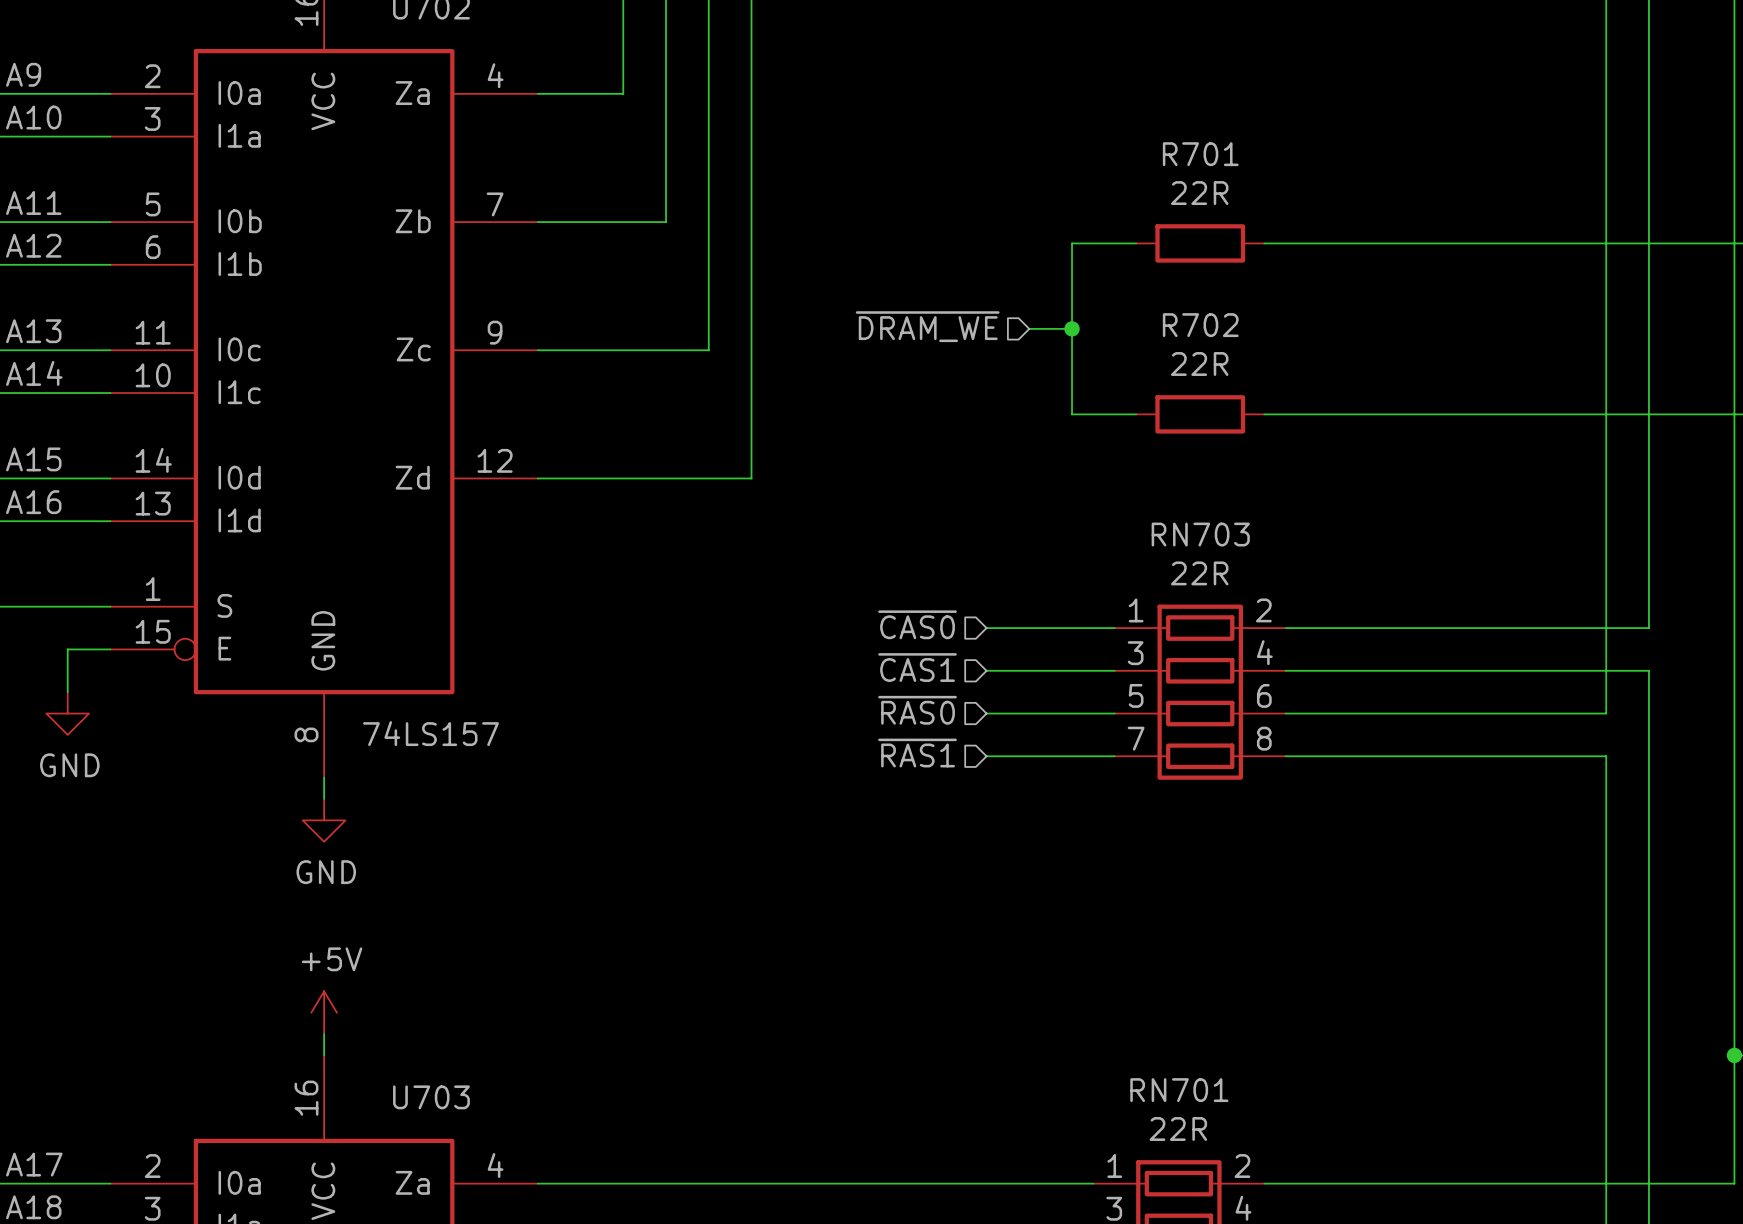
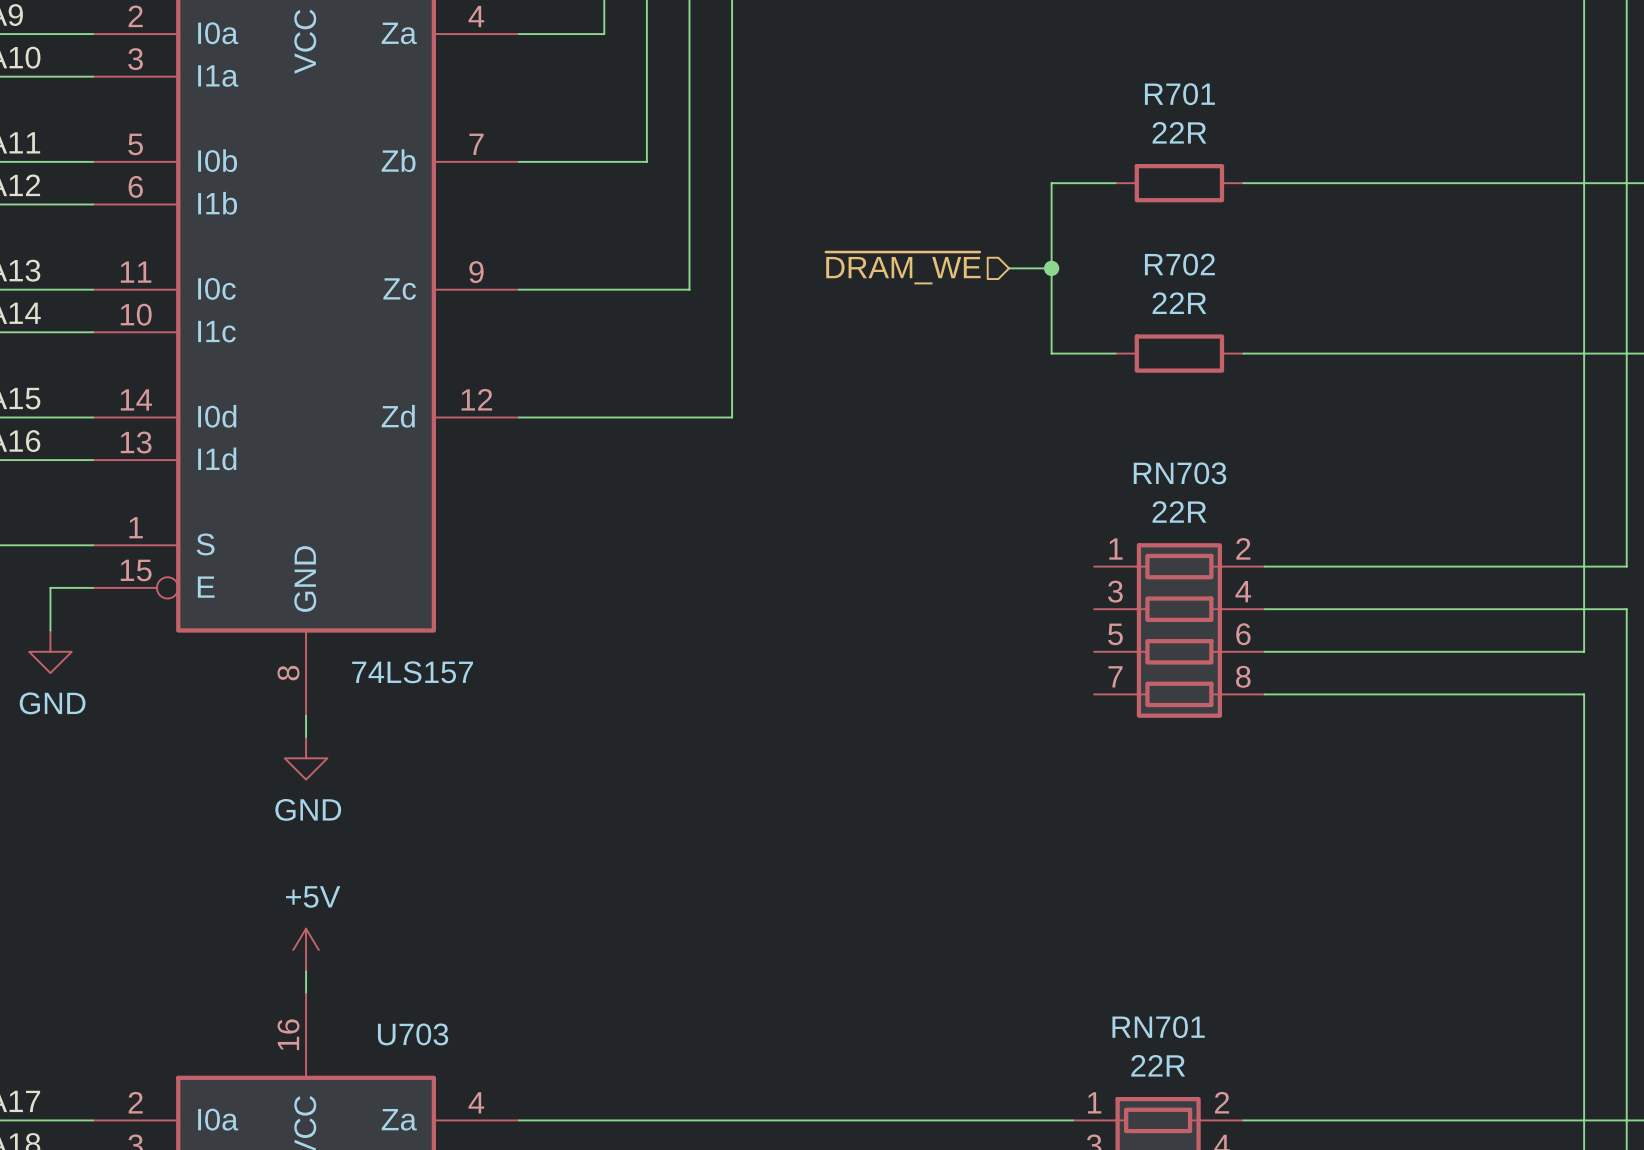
hierarchical label: ~{CAS0} (917, 624) -> none
wire: (986, 628) (1114, 628) -> none
hierarchical label: ~{CAS1} (917, 667) -> none
wire: (986, 670) (1114, 670) -> none
hierarchical label: ~{RAS0} (917, 710) -> none
wire: (986, 713) (1114, 713) -> none
hierarchical label: ~{RAS1} (917, 753) -> none
wire: (986, 756) (1114, 756) -> none

